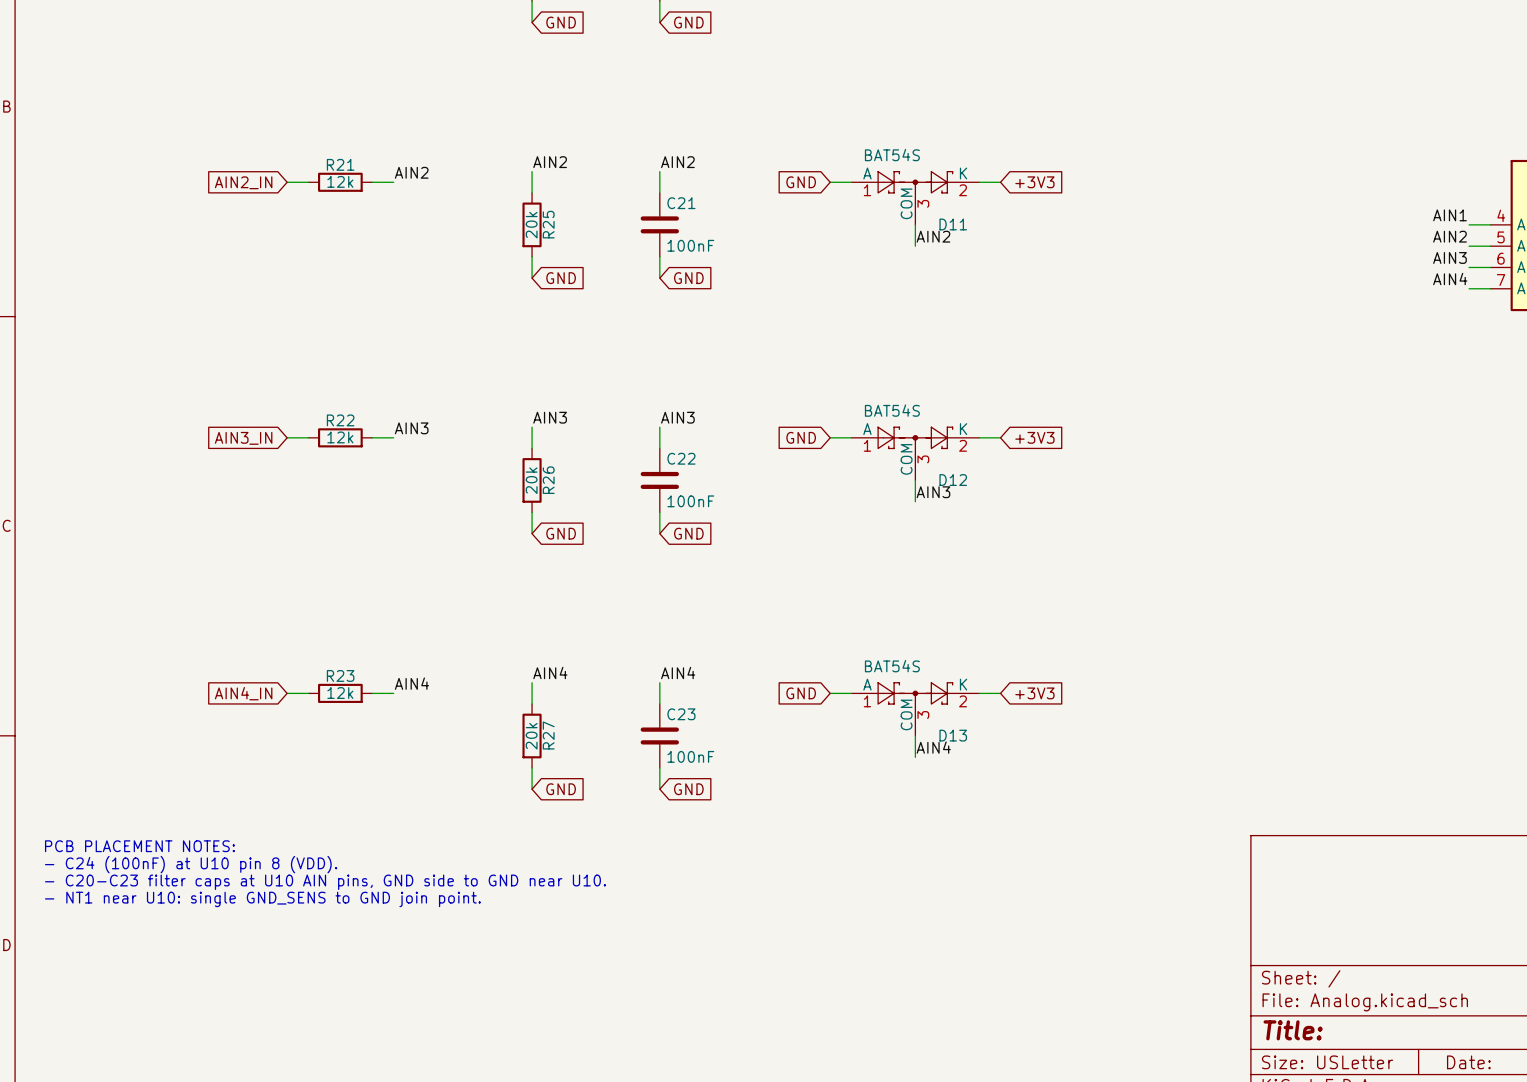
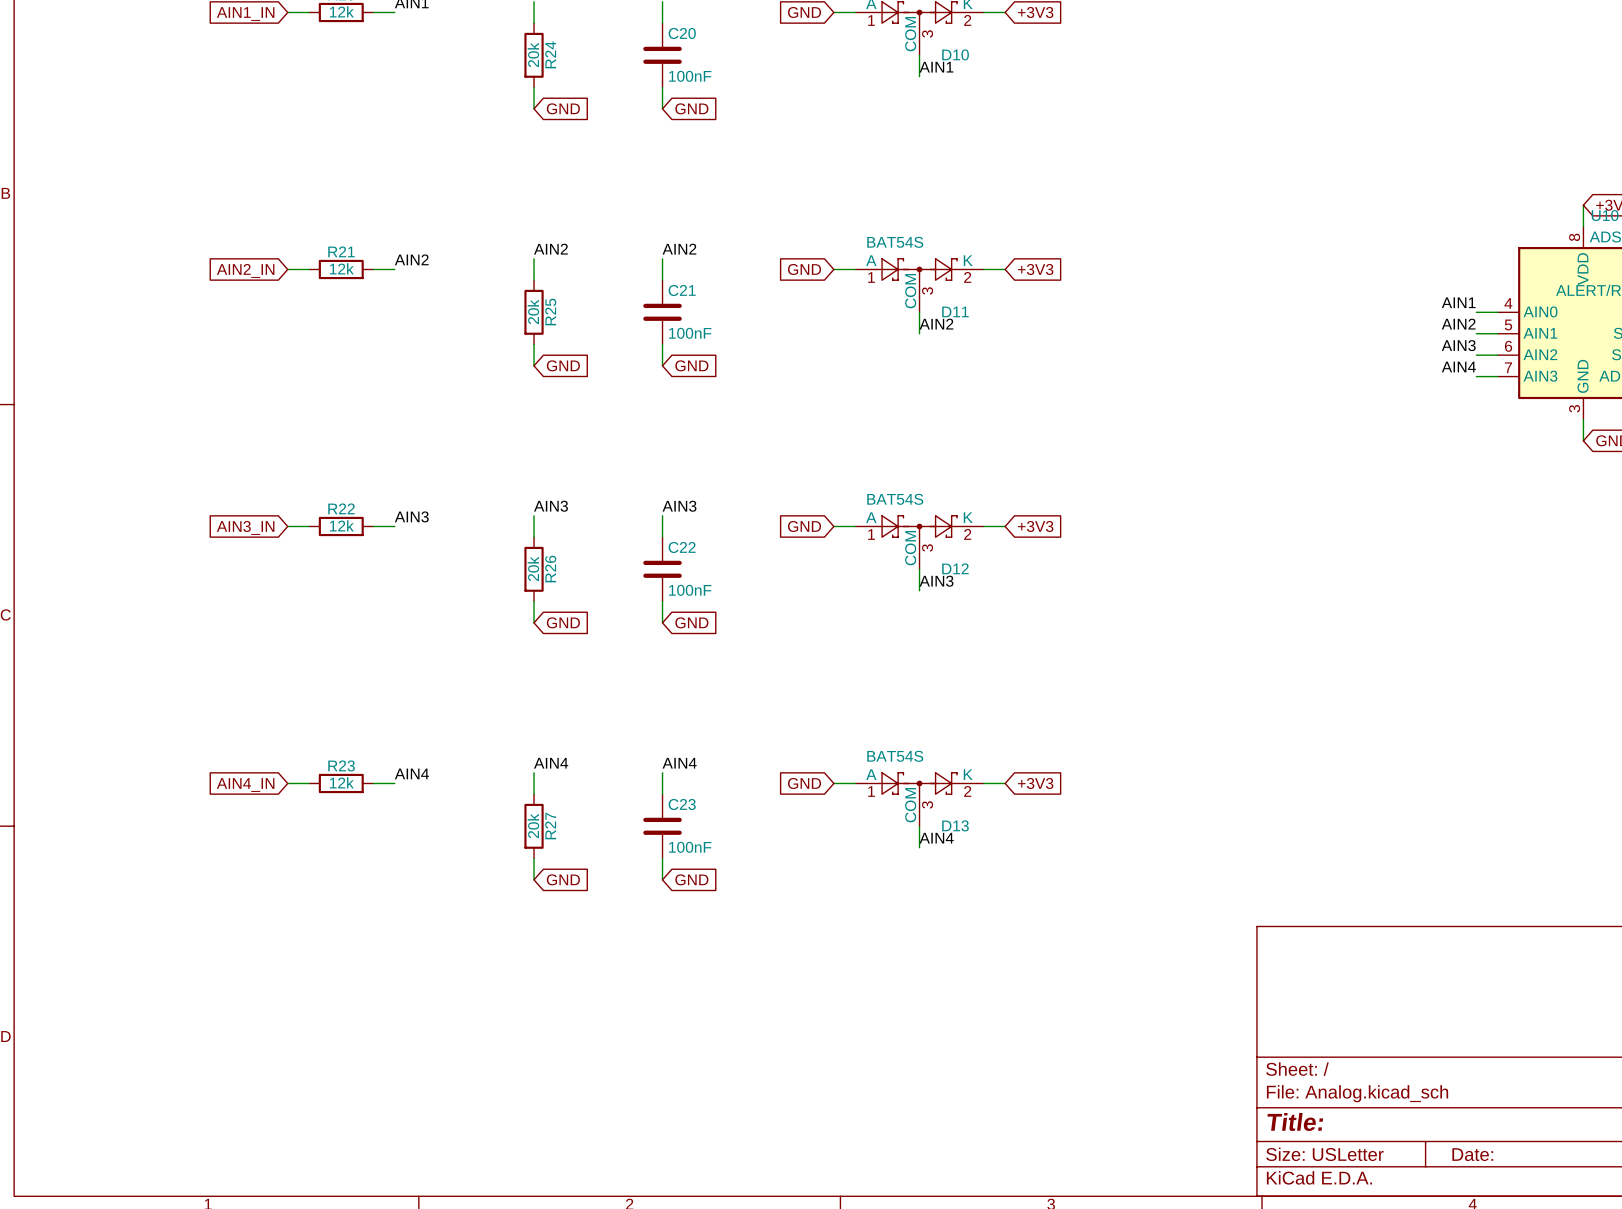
text: PCB PLACEMENT NOTES: (139, 846) -> none
text: - C24 (100nF) at U10 pin 8 (VDD). (191, 864) -> none
text: - C20-C23 filter caps at U10 AIN pins, GND side to GND near U10. (325, 882) -> none
text: - NT1 near U10: single GND_SENS to GND join point. (262, 899) -> none

